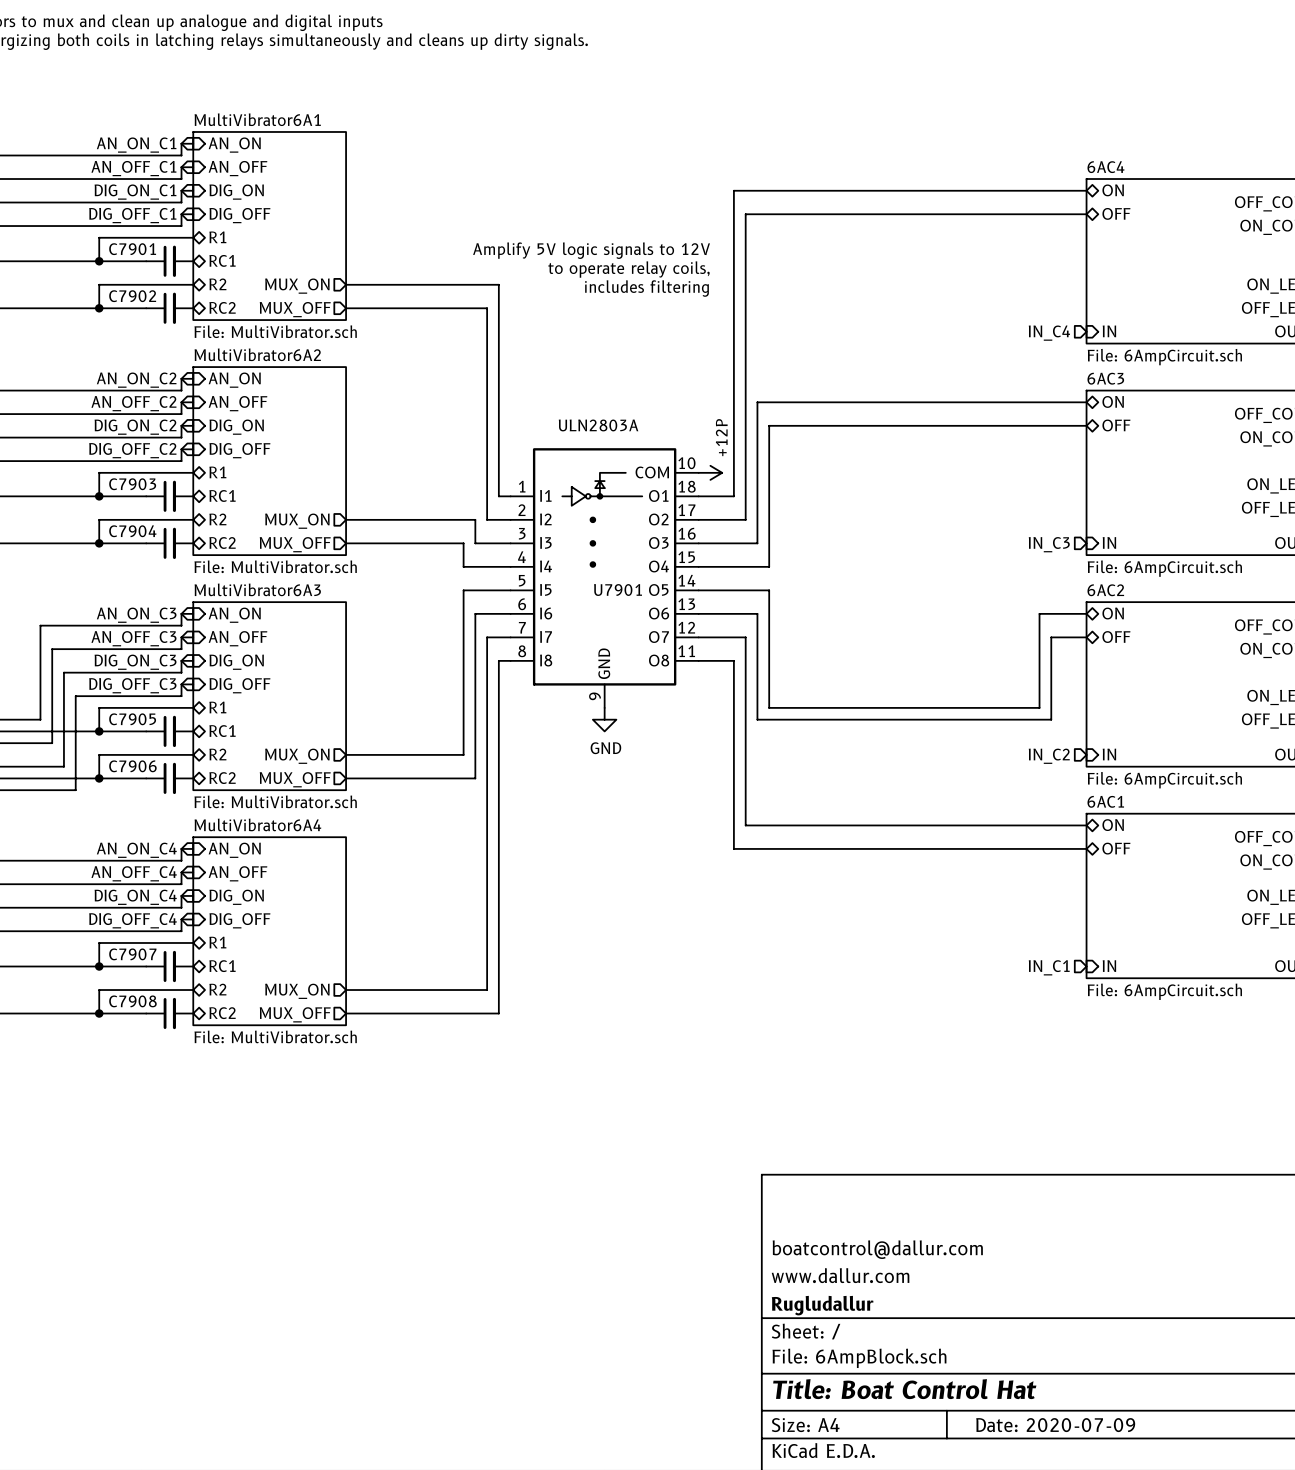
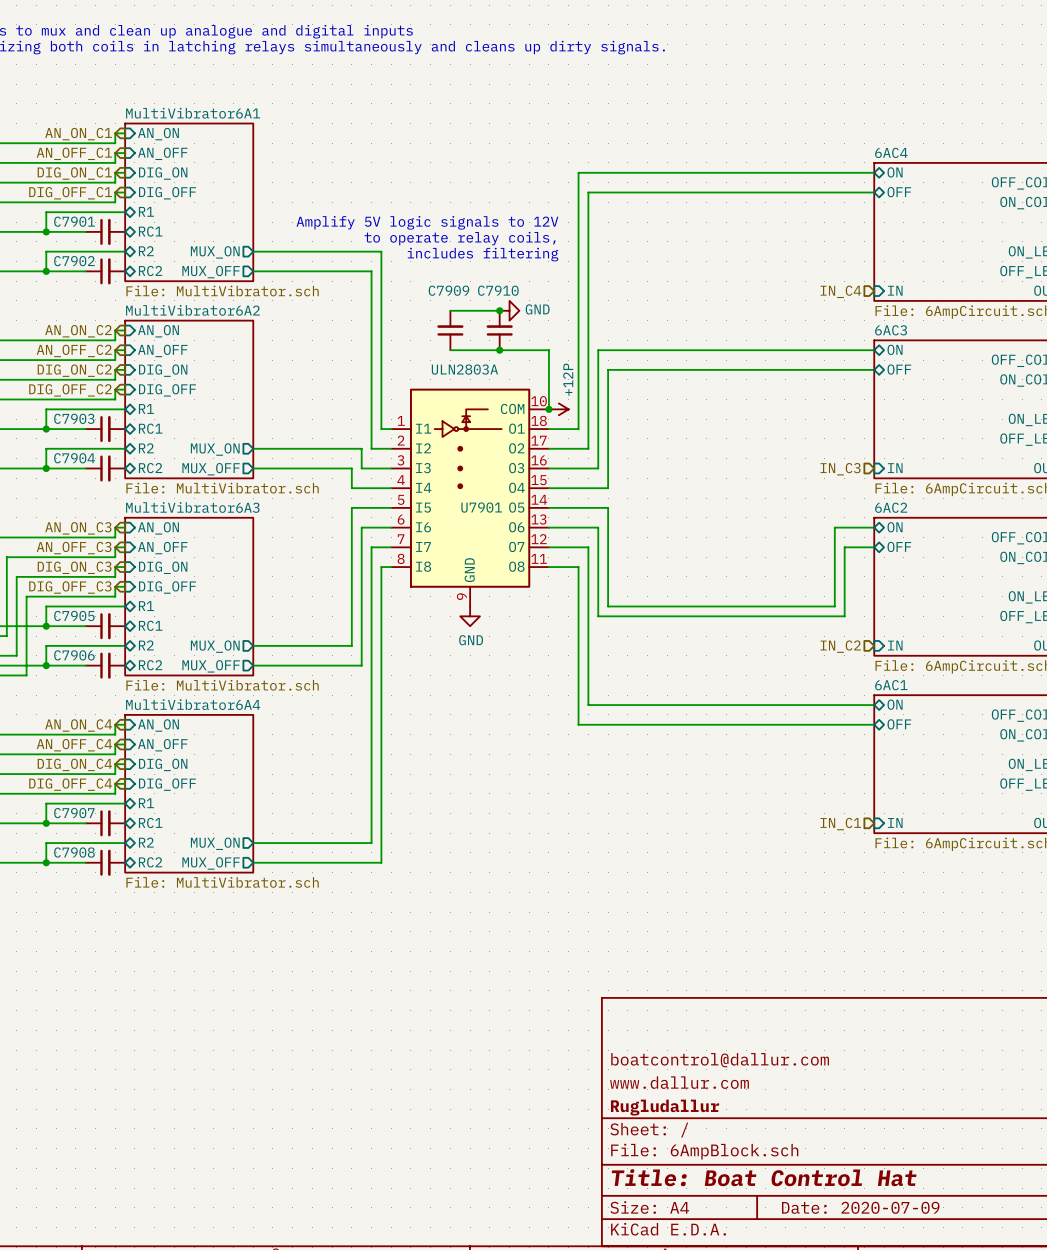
wire: none -> (450, 310) (499, 310)
junction: none -> (499, 310)
power symbol: none -> GND (509, 310)
C7909: none -> (450, 330)
C7910: none -> (499, 330)
wire: none -> (450, 350) (548, 350) (548, 409)
junction: none -> (499, 350)
junction: none -> (548, 409)

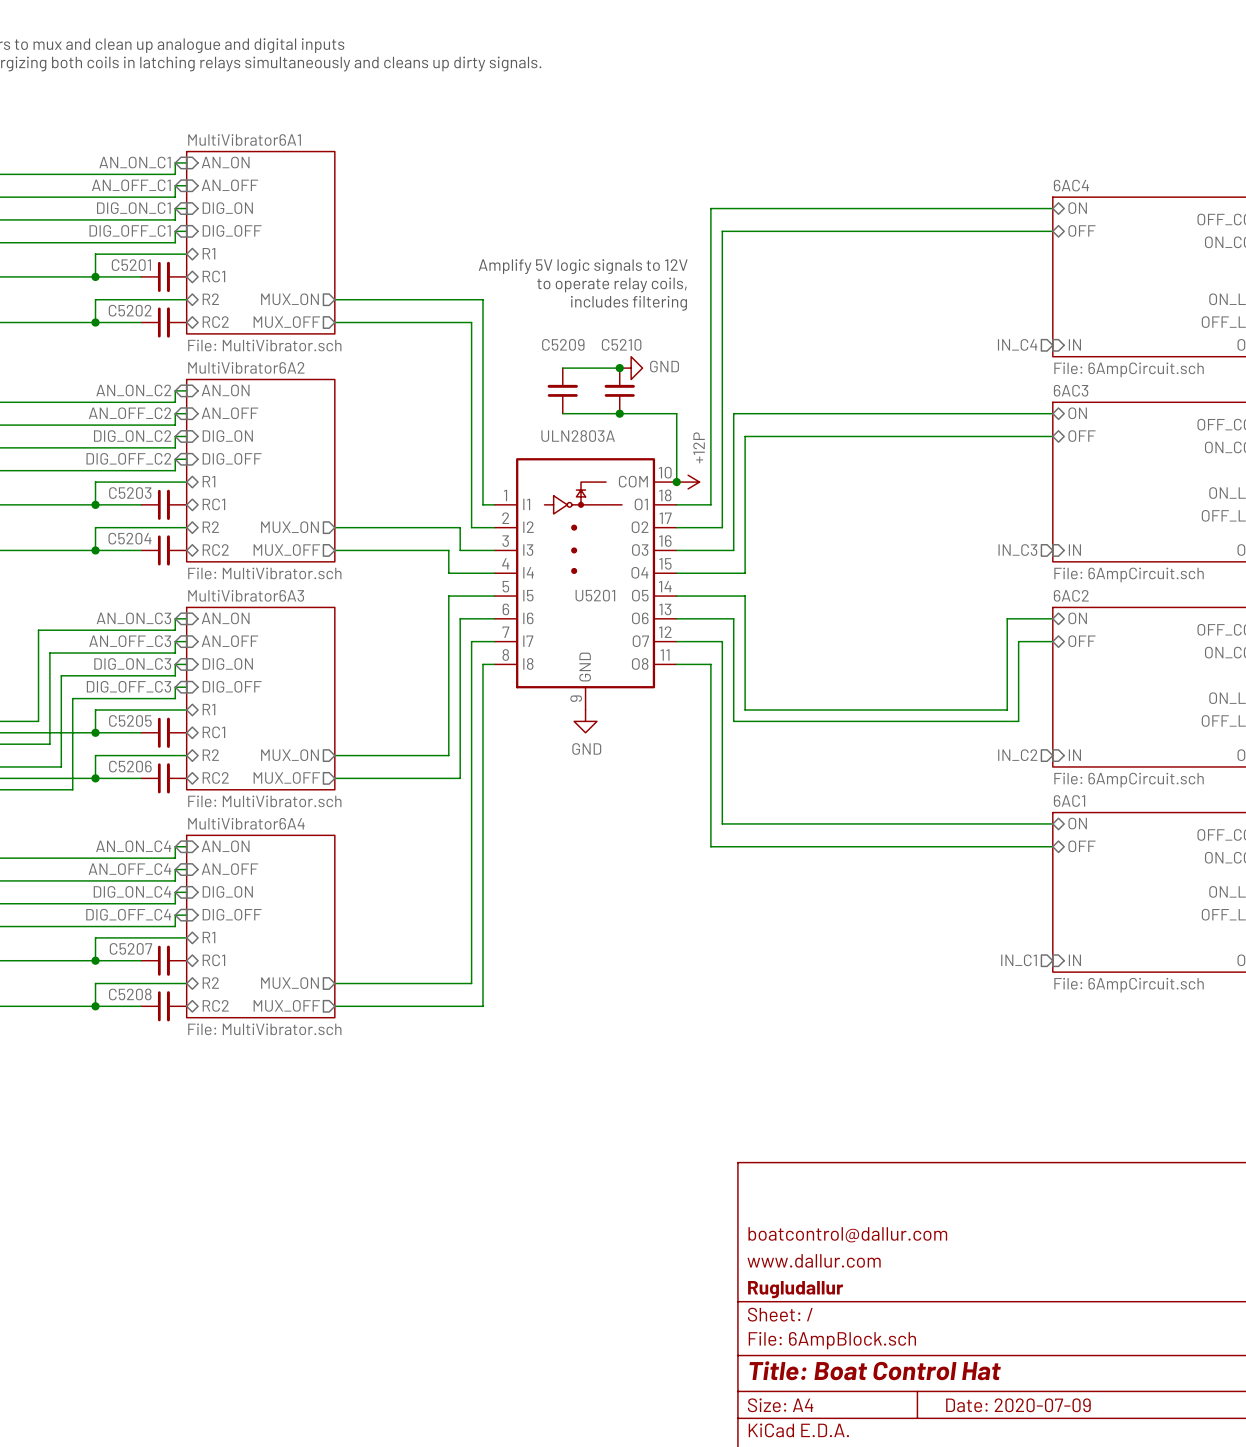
C7901 name: C7901 (74, 221) -> C5201 (131, 265)
C7902 name: C7902 (74, 261) -> C5202 (130, 310)
C7909 name: C7909 (448, 290) -> C5209 (563, 344)
C7910 name: C7910 (498, 290) -> C5210 (621, 344)
C7903 name: C7903 (74, 418) -> C5203 (130, 493)
C7904 name: C7904 (74, 458) -> C5204 (130, 538)
U7901 name: U7901 (481, 507) -> U5201 (595, 595)
C7905 name: C7905 (74, 615) -> C5205 (130, 720)
C7906 name: C7906 (74, 655) -> C5206 (130, 766)
C7907 name: C7907 (74, 813) -> C5207 (130, 948)
C7908 name: C7908 (74, 852) -> C5208 (130, 994)

